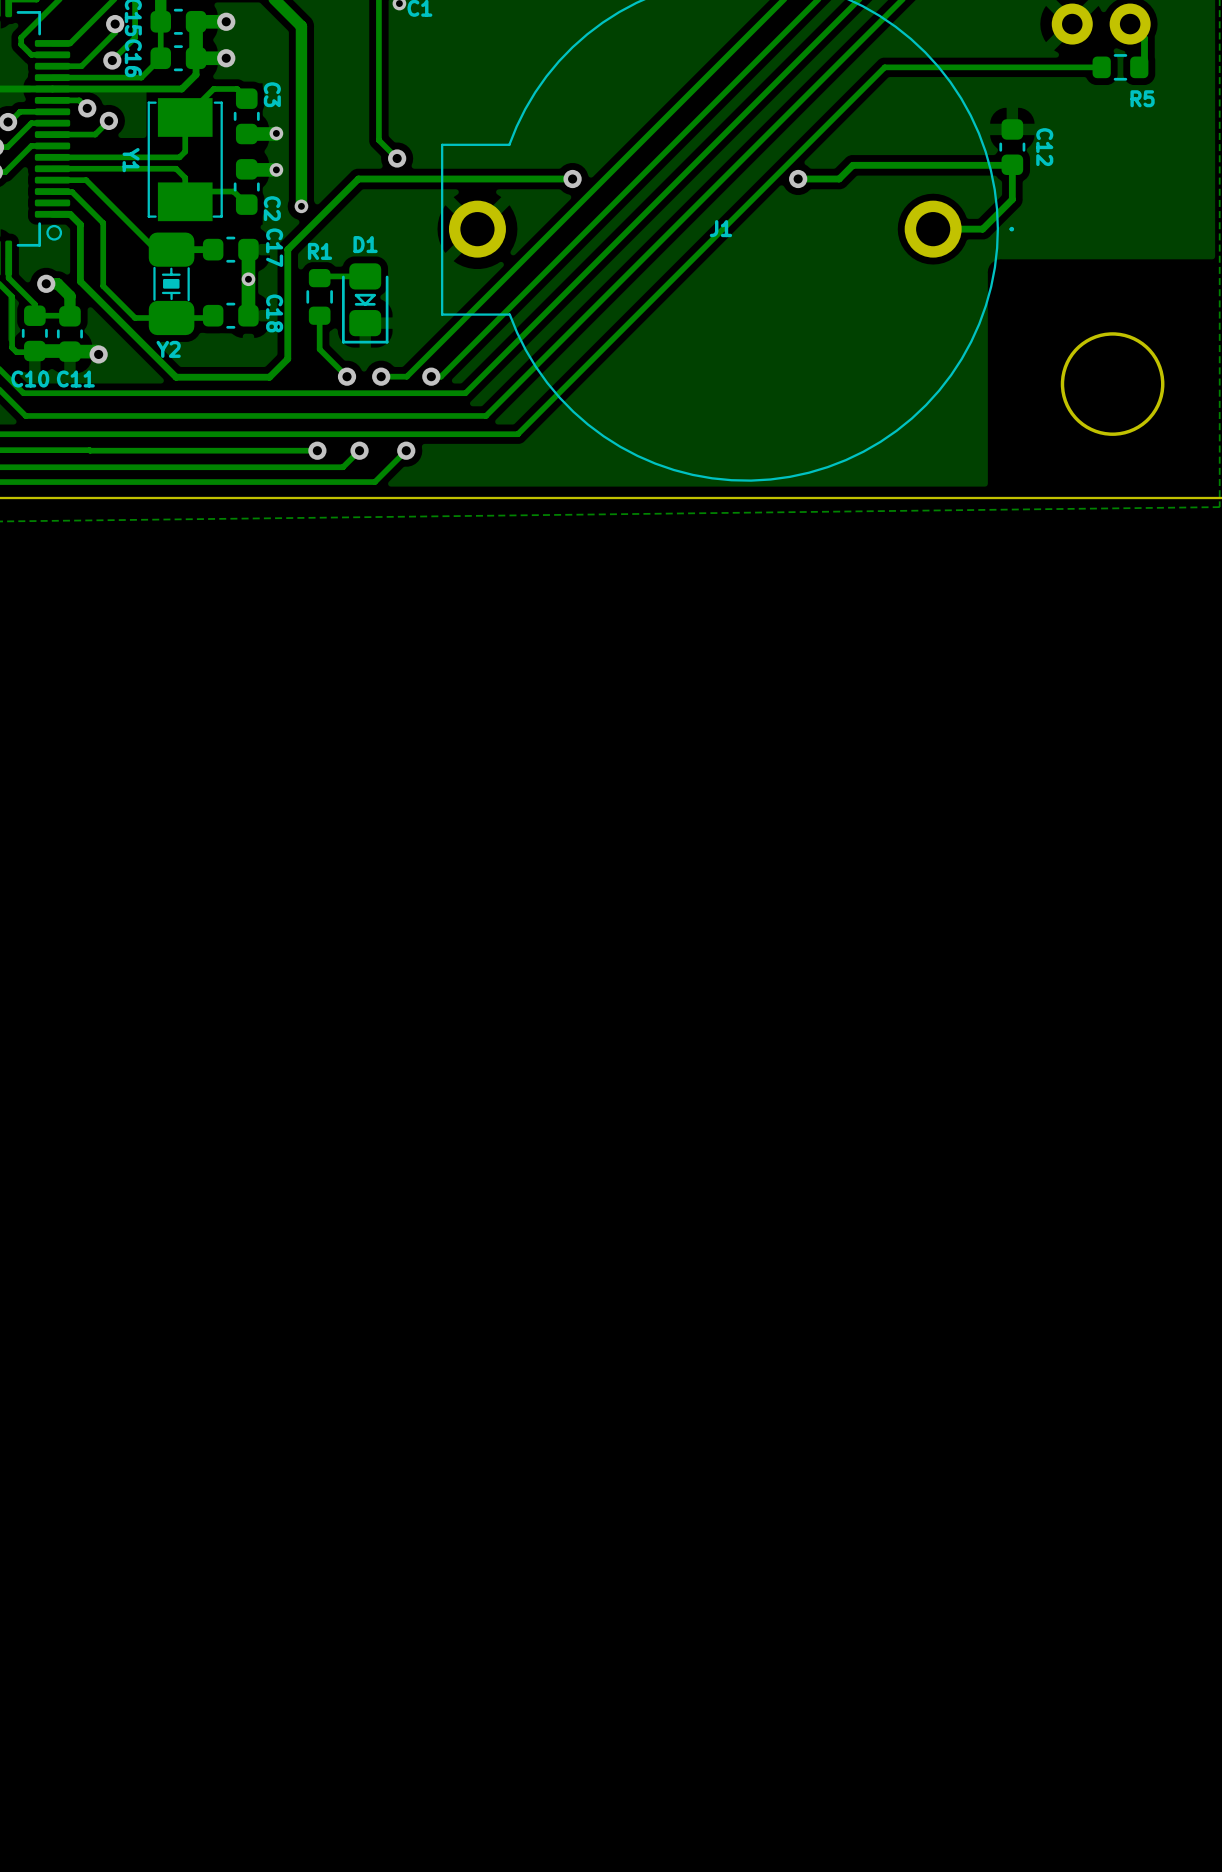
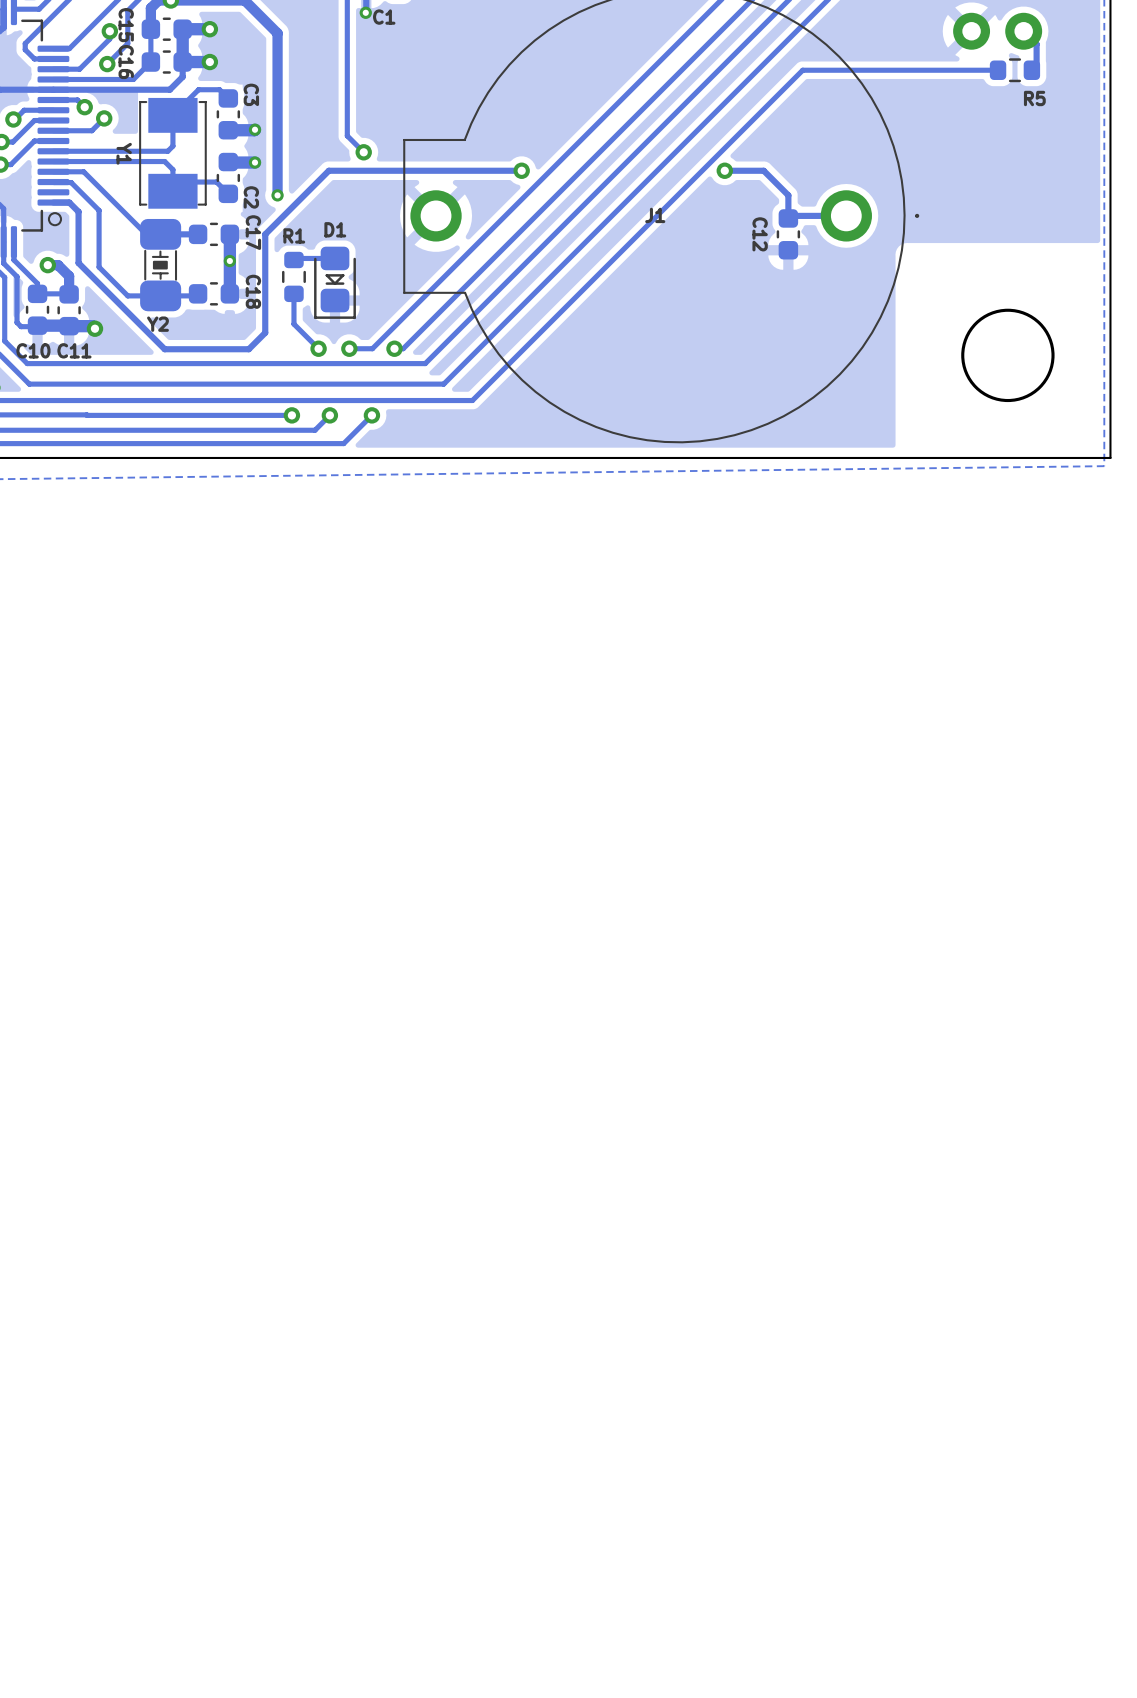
C12 position: (1012, 147) -> (788, 234)
C12 name position: C12 (1044, 147) -> C12 (760, 234)
track: (839, 179) (852, 165) (1012, 164) (1012, 199) (982, 229) (935, 229) -> (761, 170) (788, 195) (788, 218) (790, 215) (846, 215)

